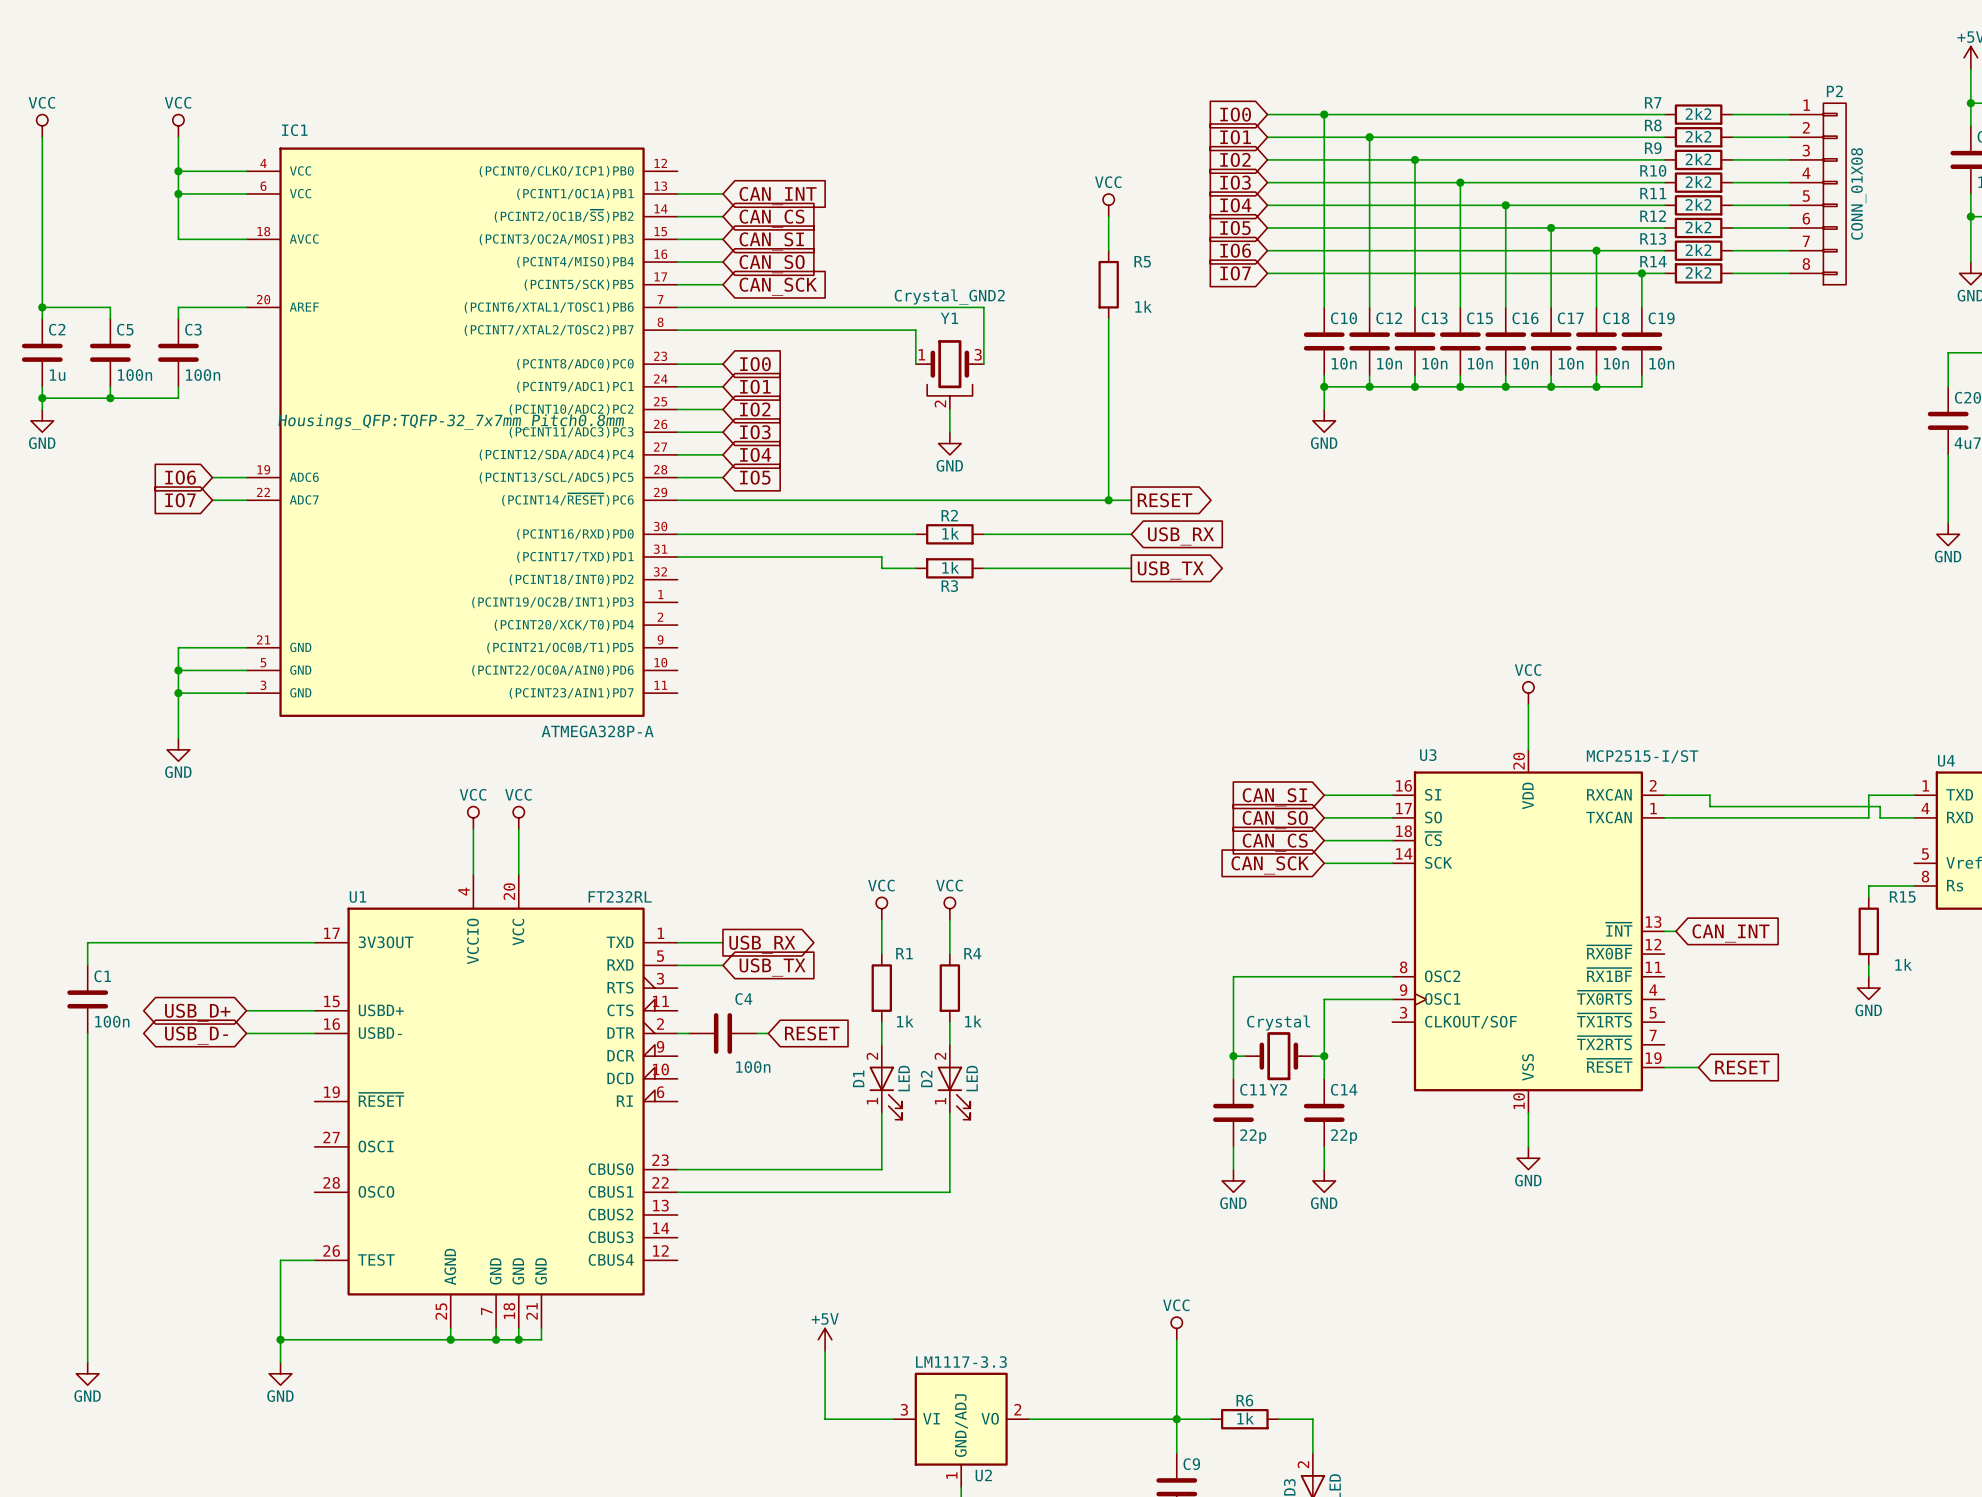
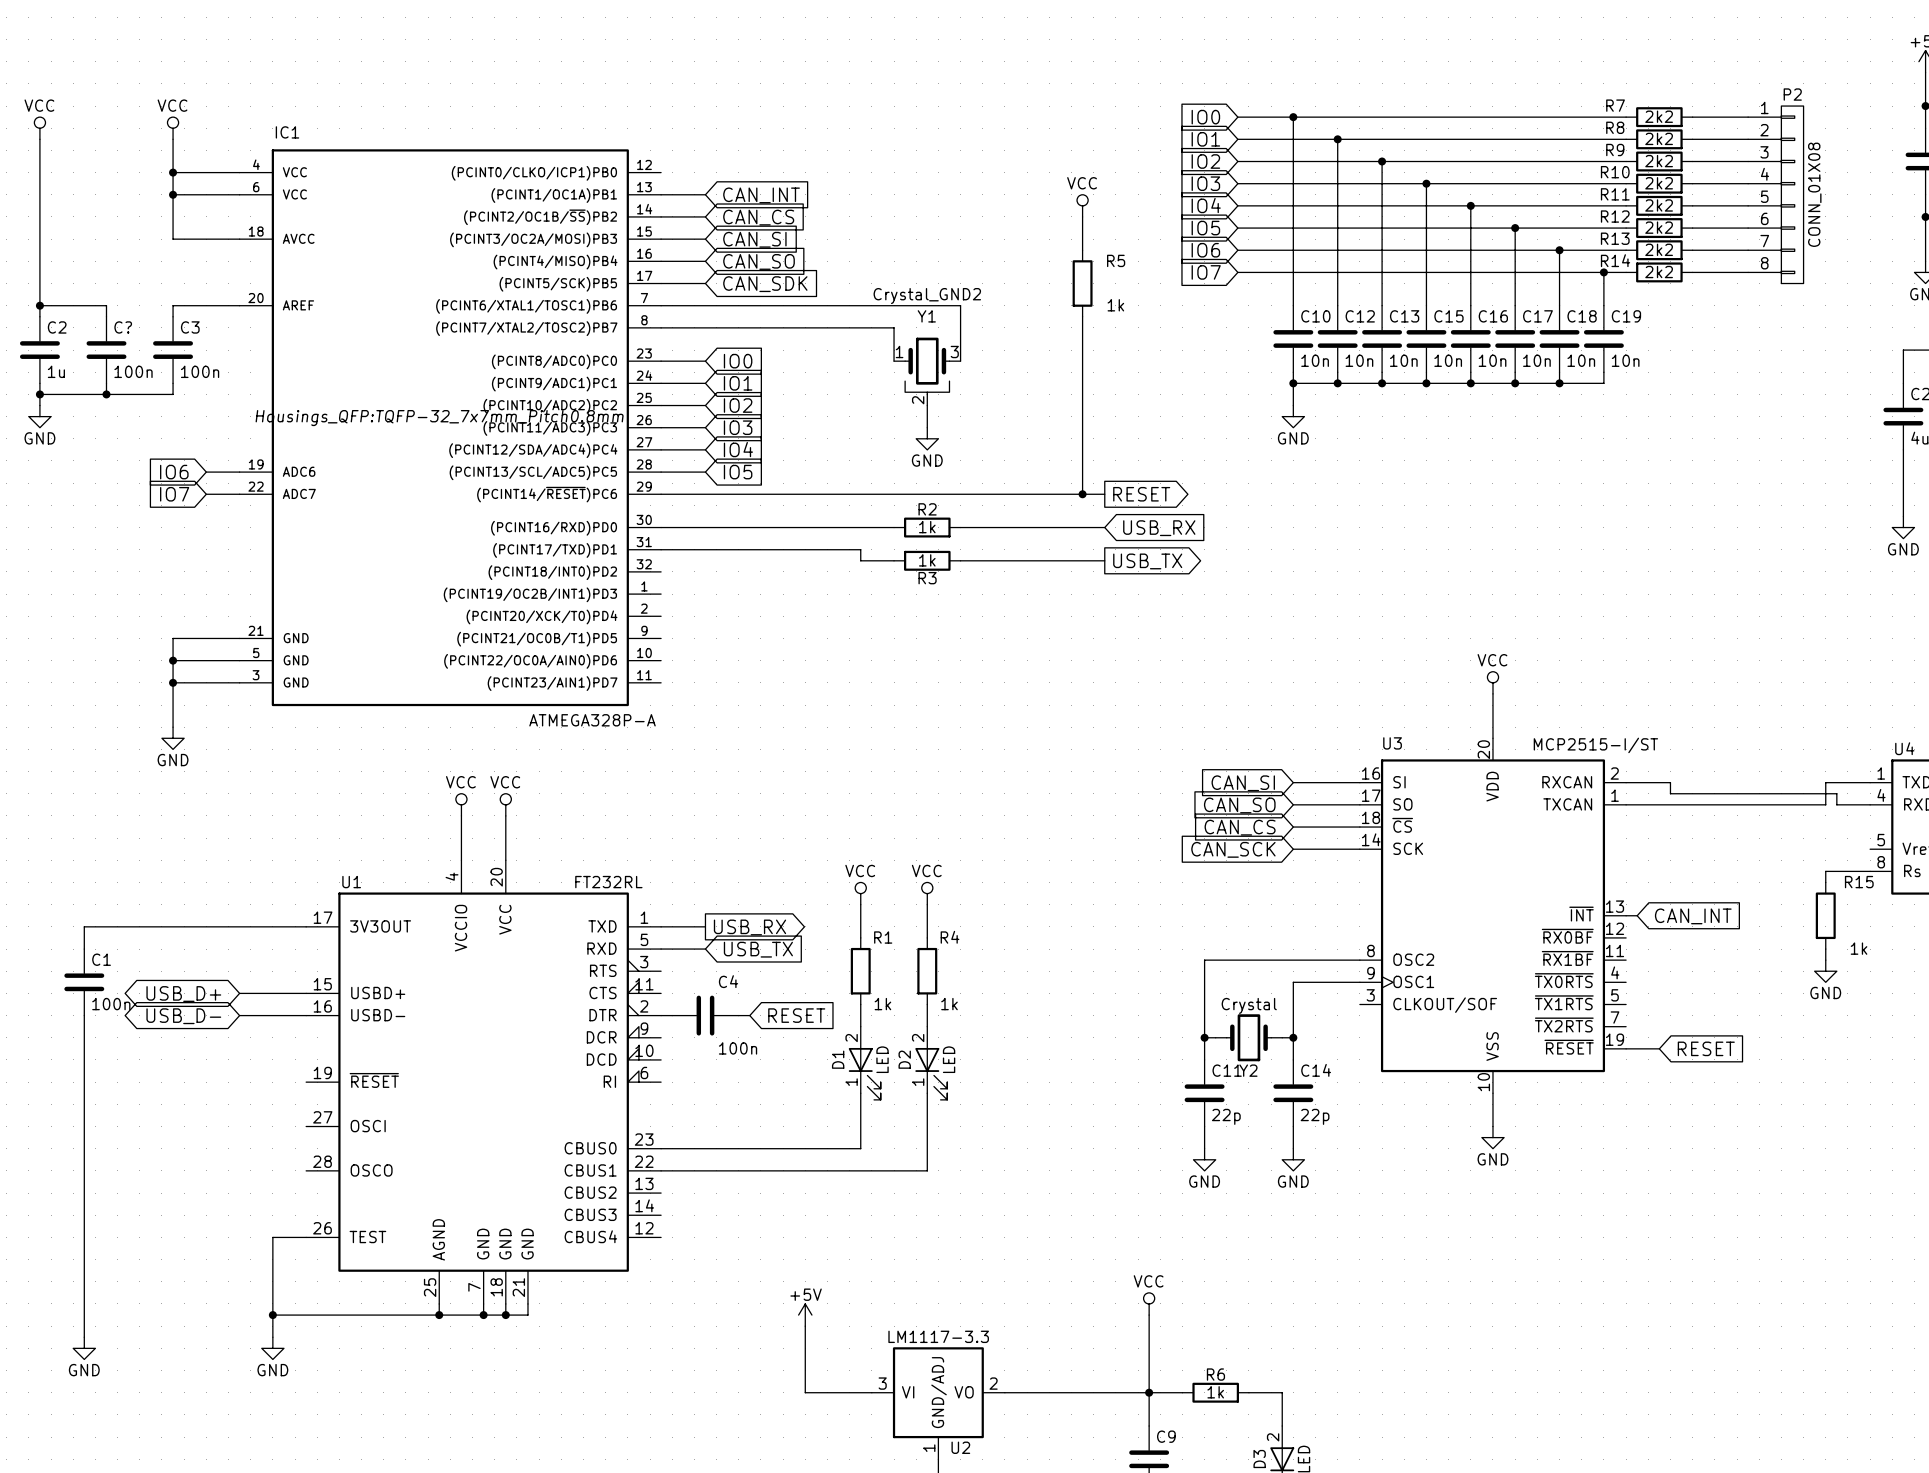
global label: CAN_SCK (778, 286) -> CAN_SDK (765, 284)
C5 name: C5 (125, 329) -> C? (123, 327)

